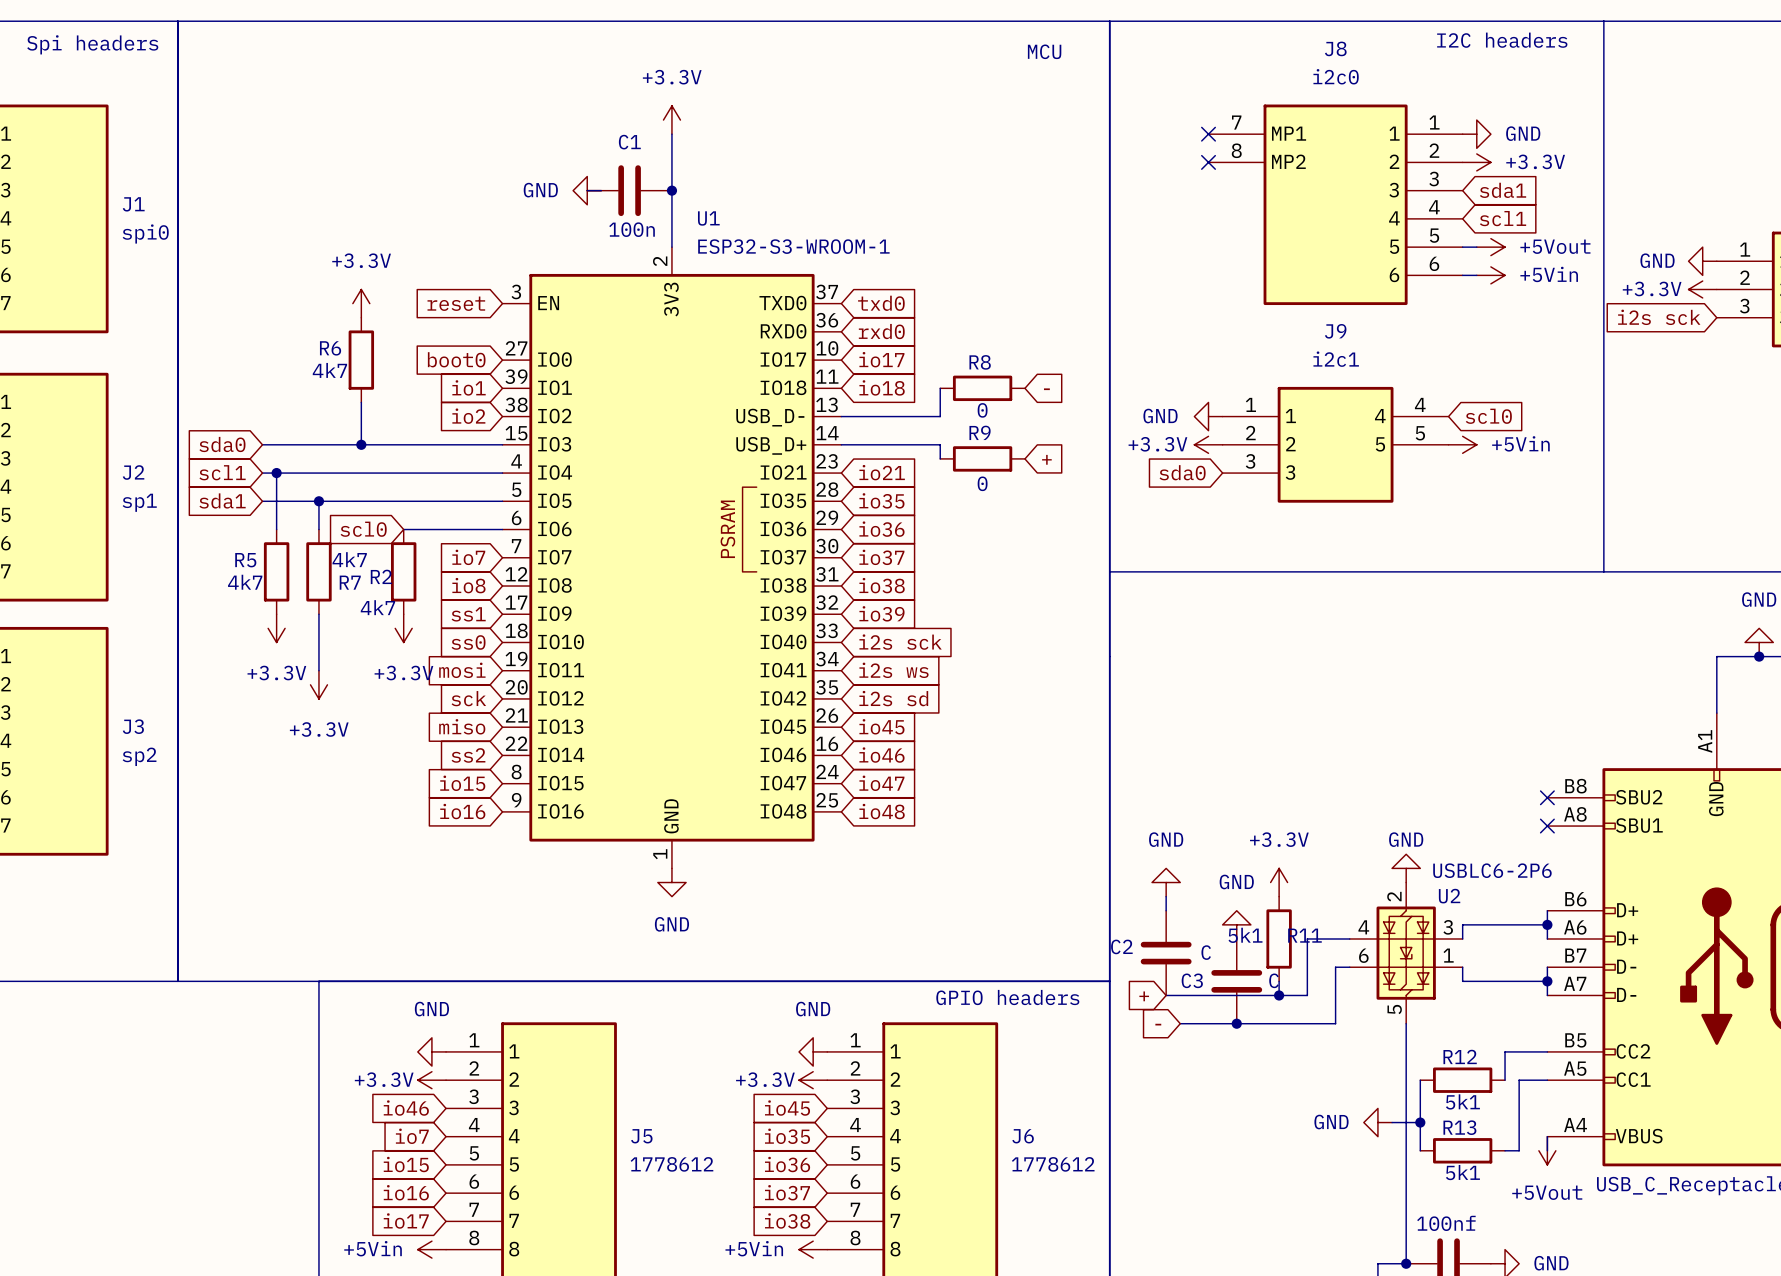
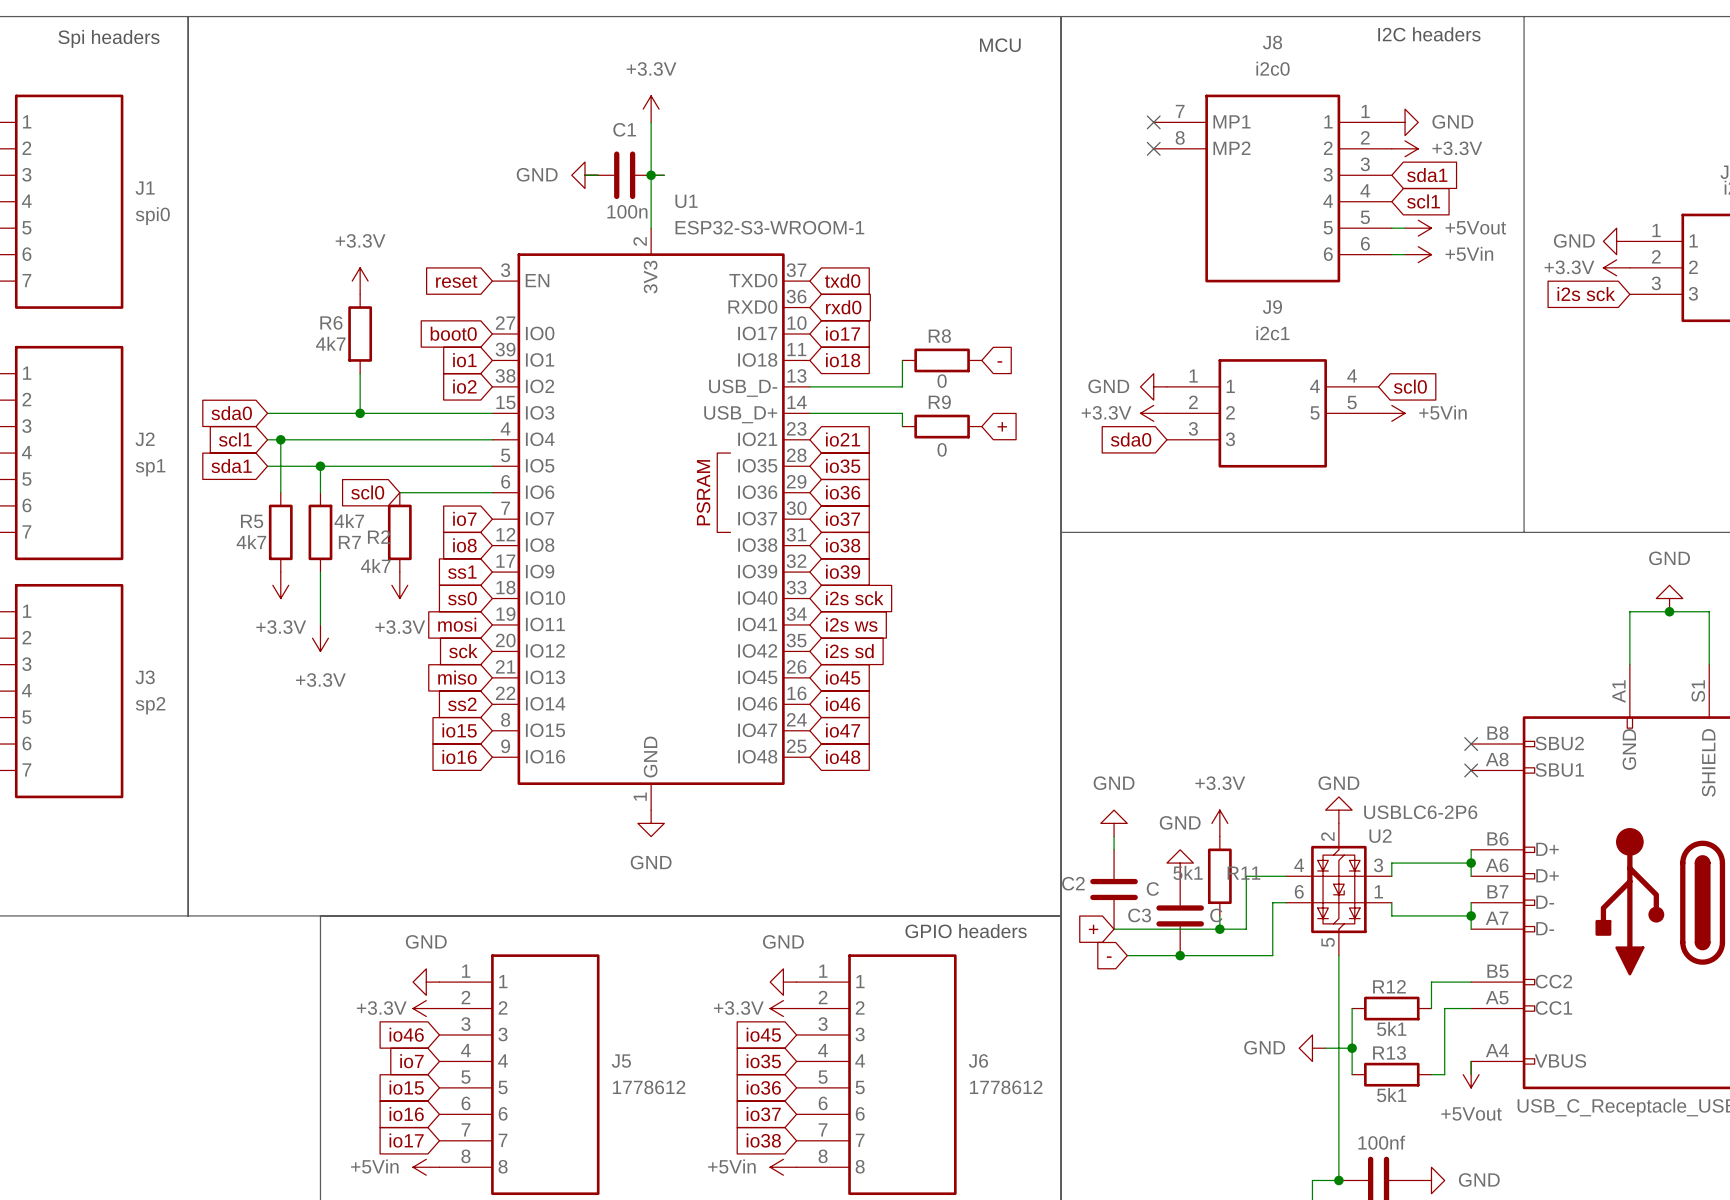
power symbol position: GND (587, 190) -> GND (584, 175)
C1 position: (629, 190) -> (624, 175)
wire: none -> (651, 175) (664, 175)

